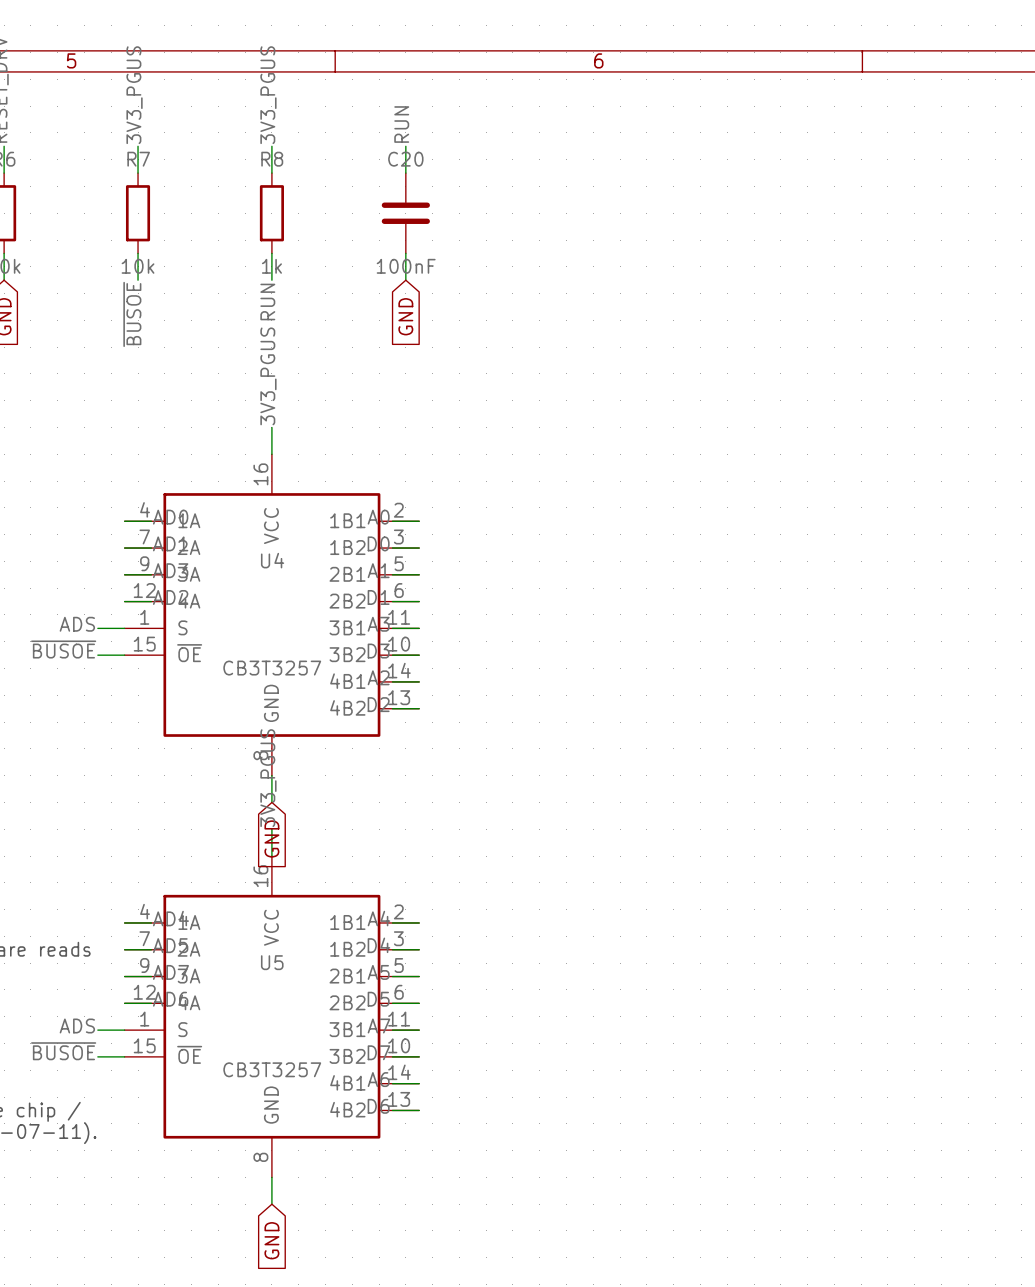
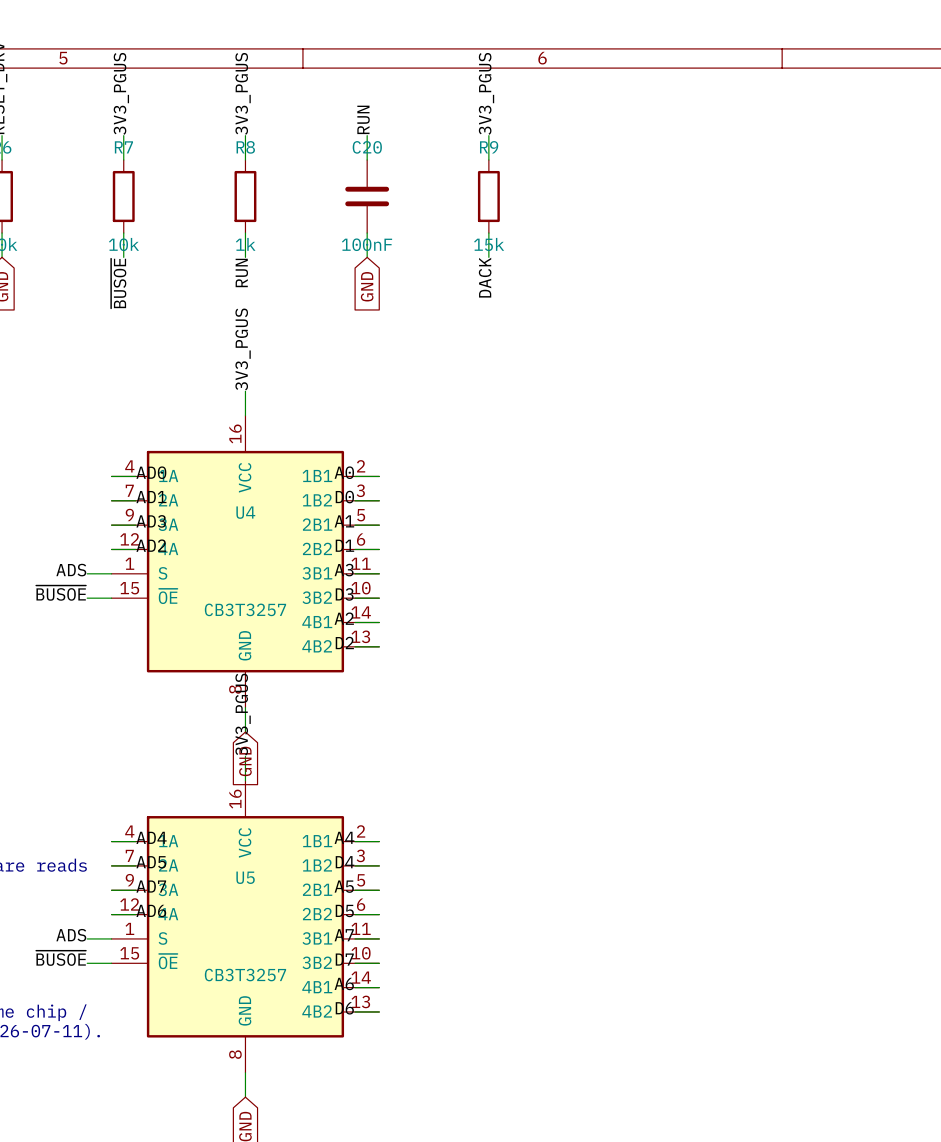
label: none -> 3V3_PGUS (486, 93)
wire: none -> (488, 135) (488, 160)
R9: none -> 15k (488, 196)
wire: none -> (488, 233) (488, 257)
label: none -> DACK (485, 277)

